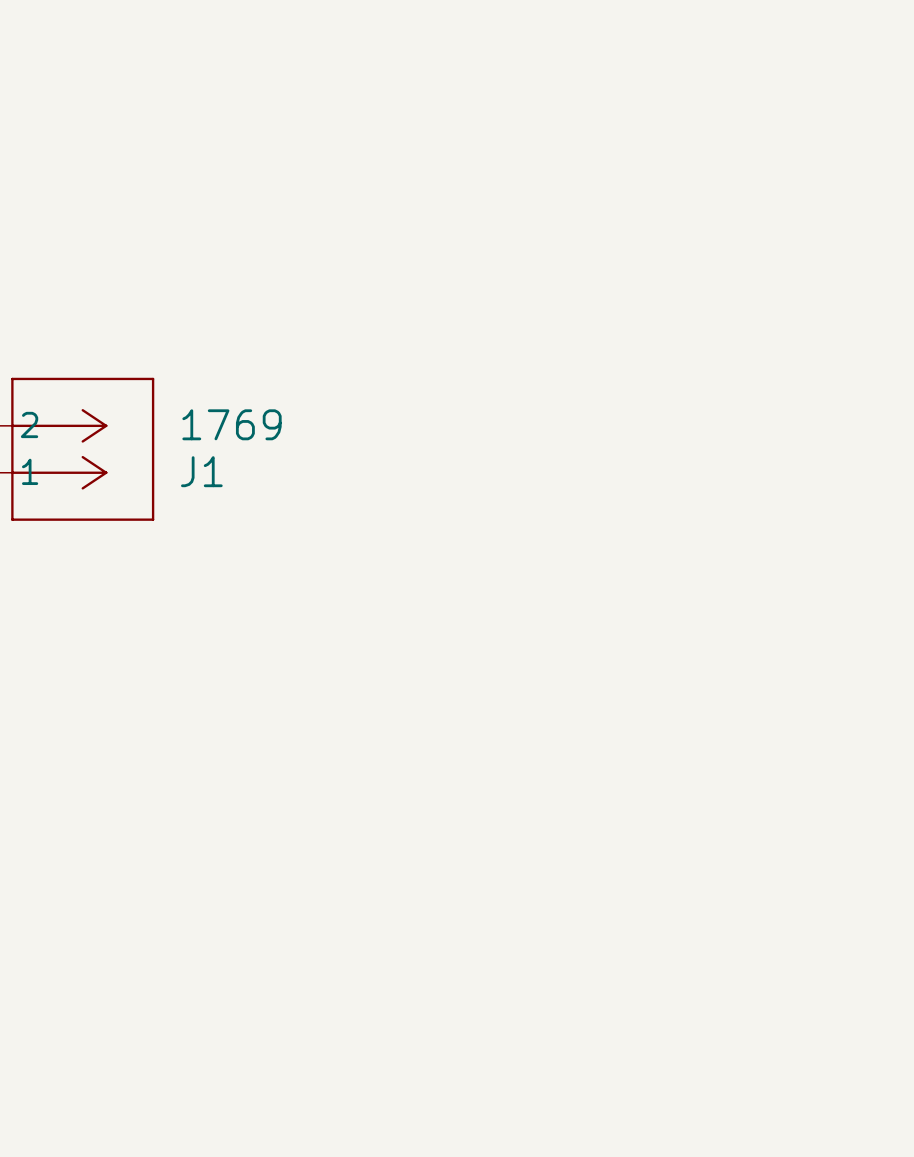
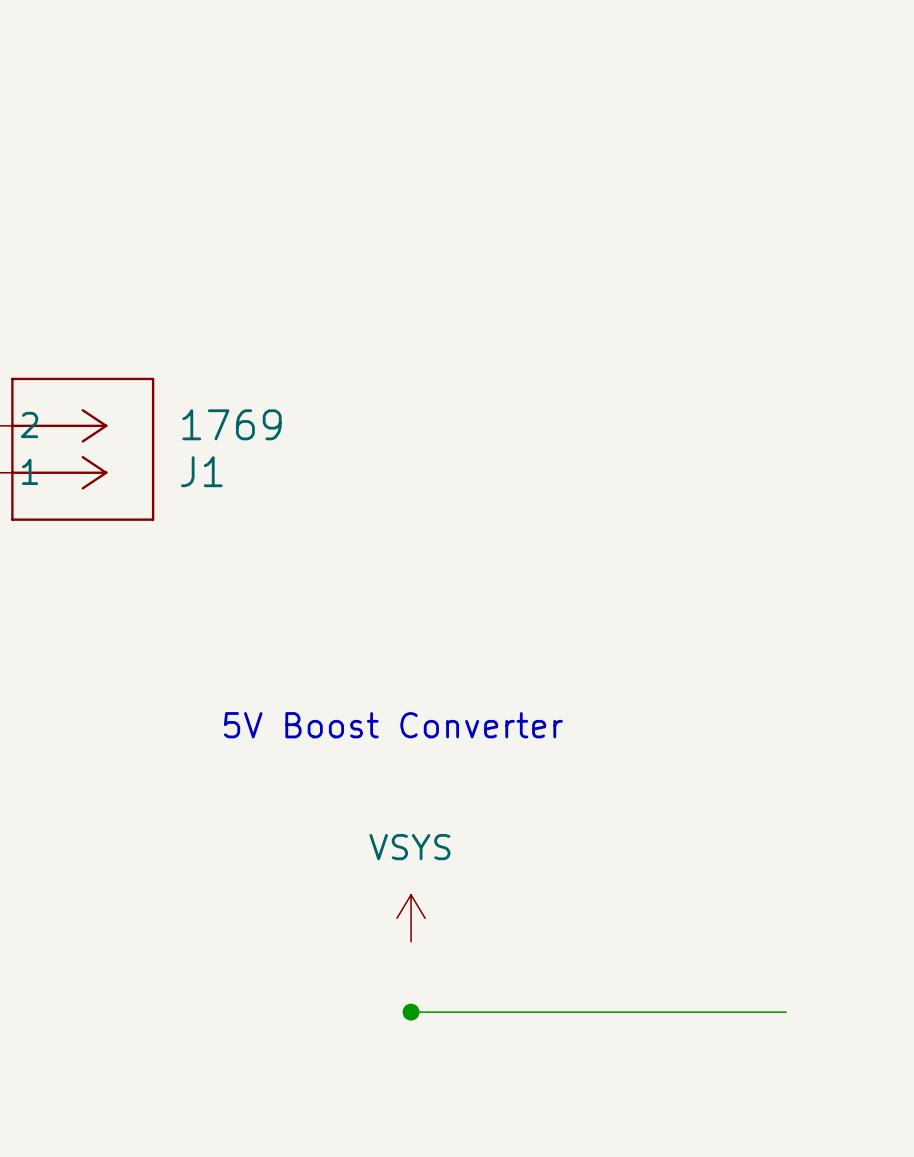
text: none -> 5V Boost Converter (393, 725)
power symbol: none -> VSYS (411, 918)
wire: none -> (411, 1012) (786, 1012)
junction: none -> (411, 1012)

